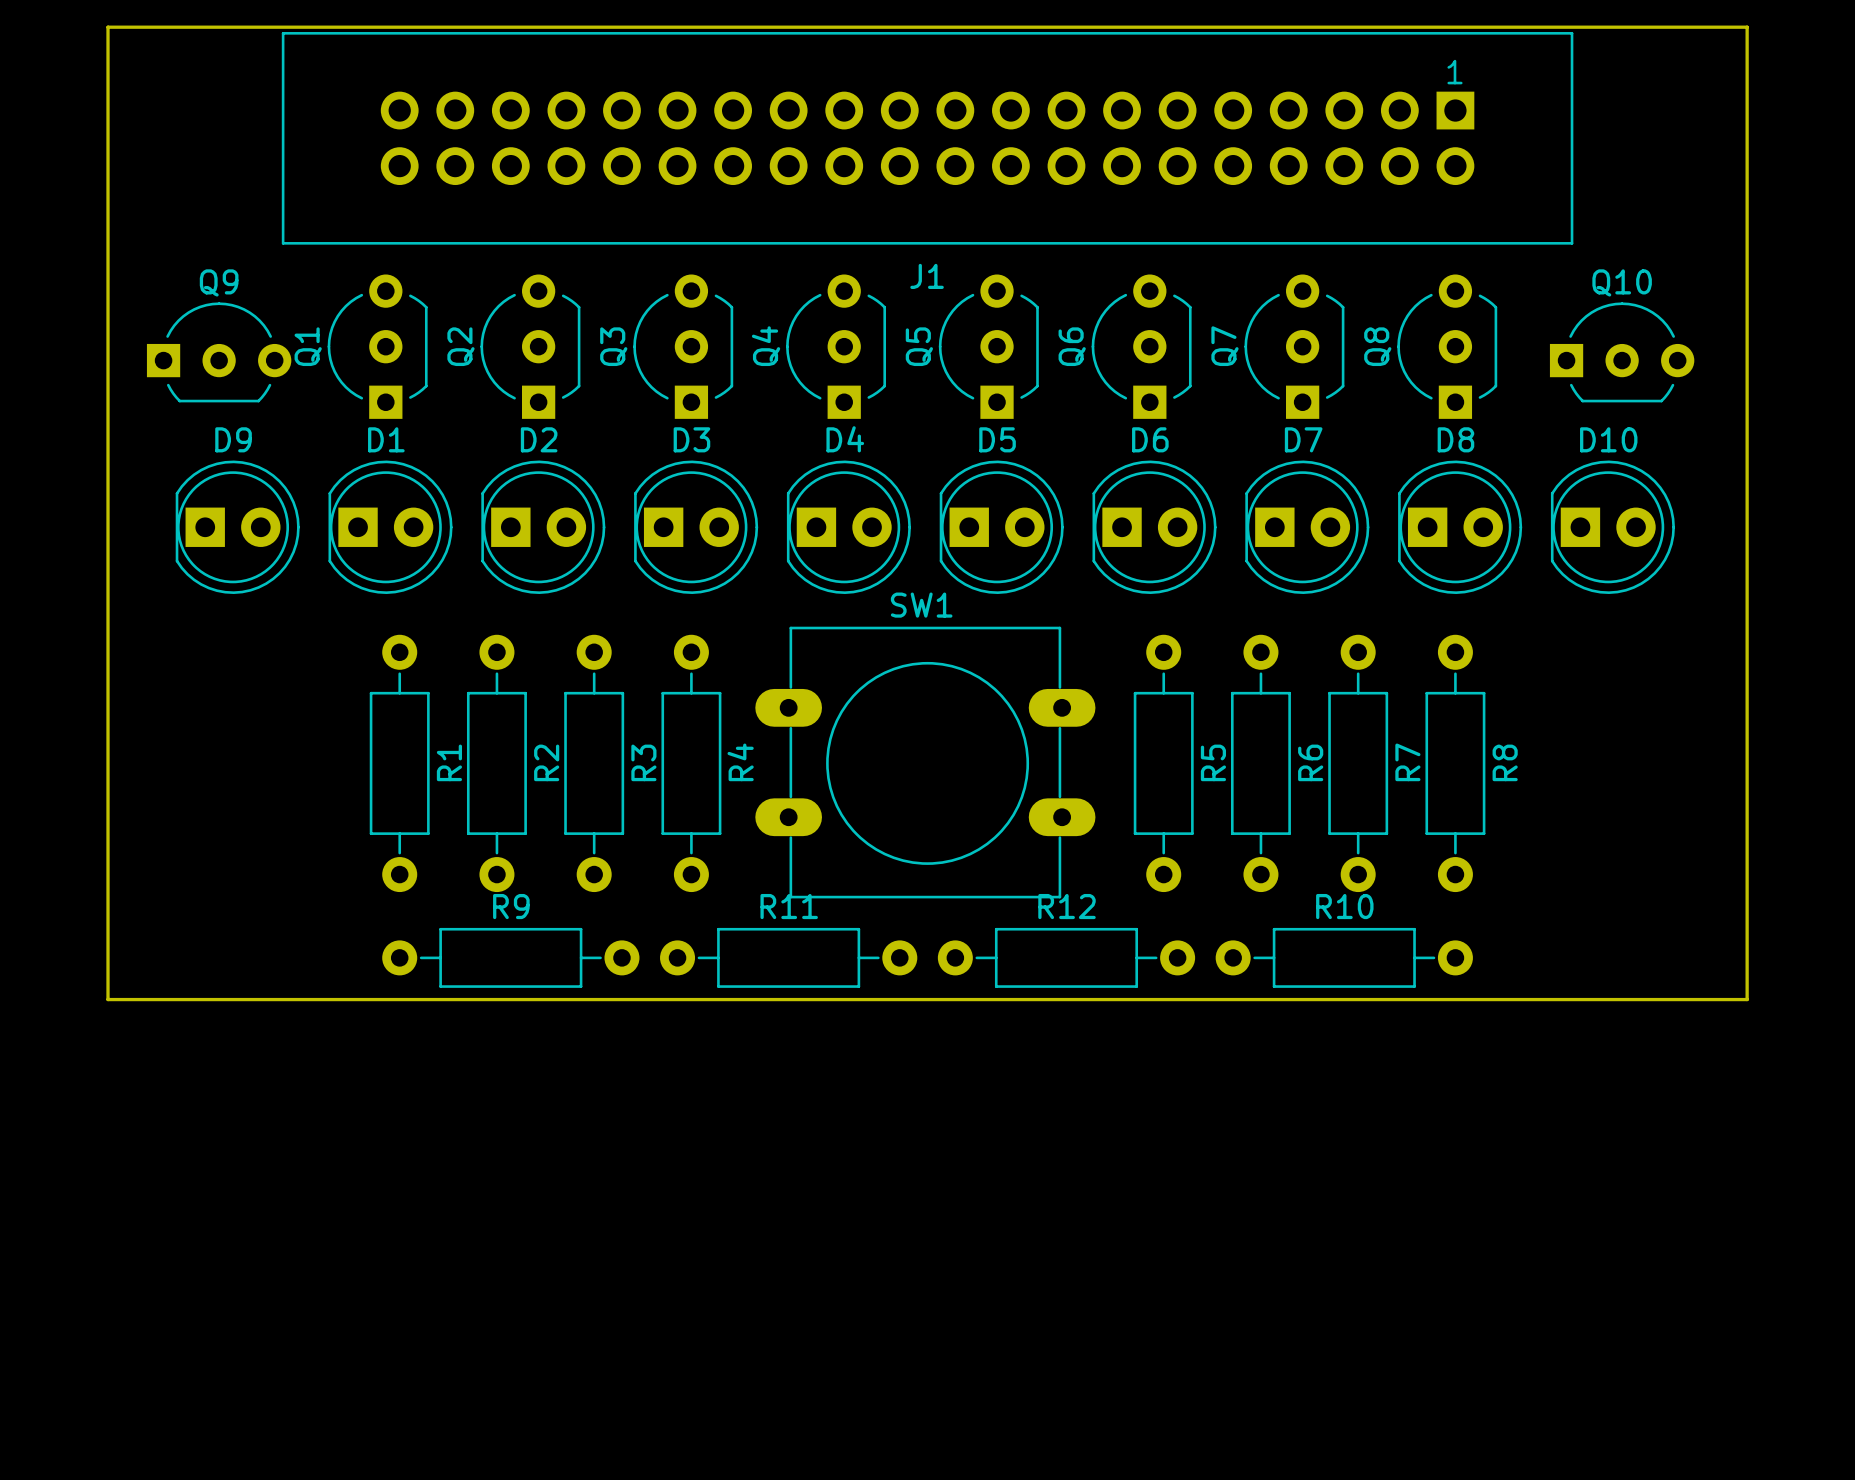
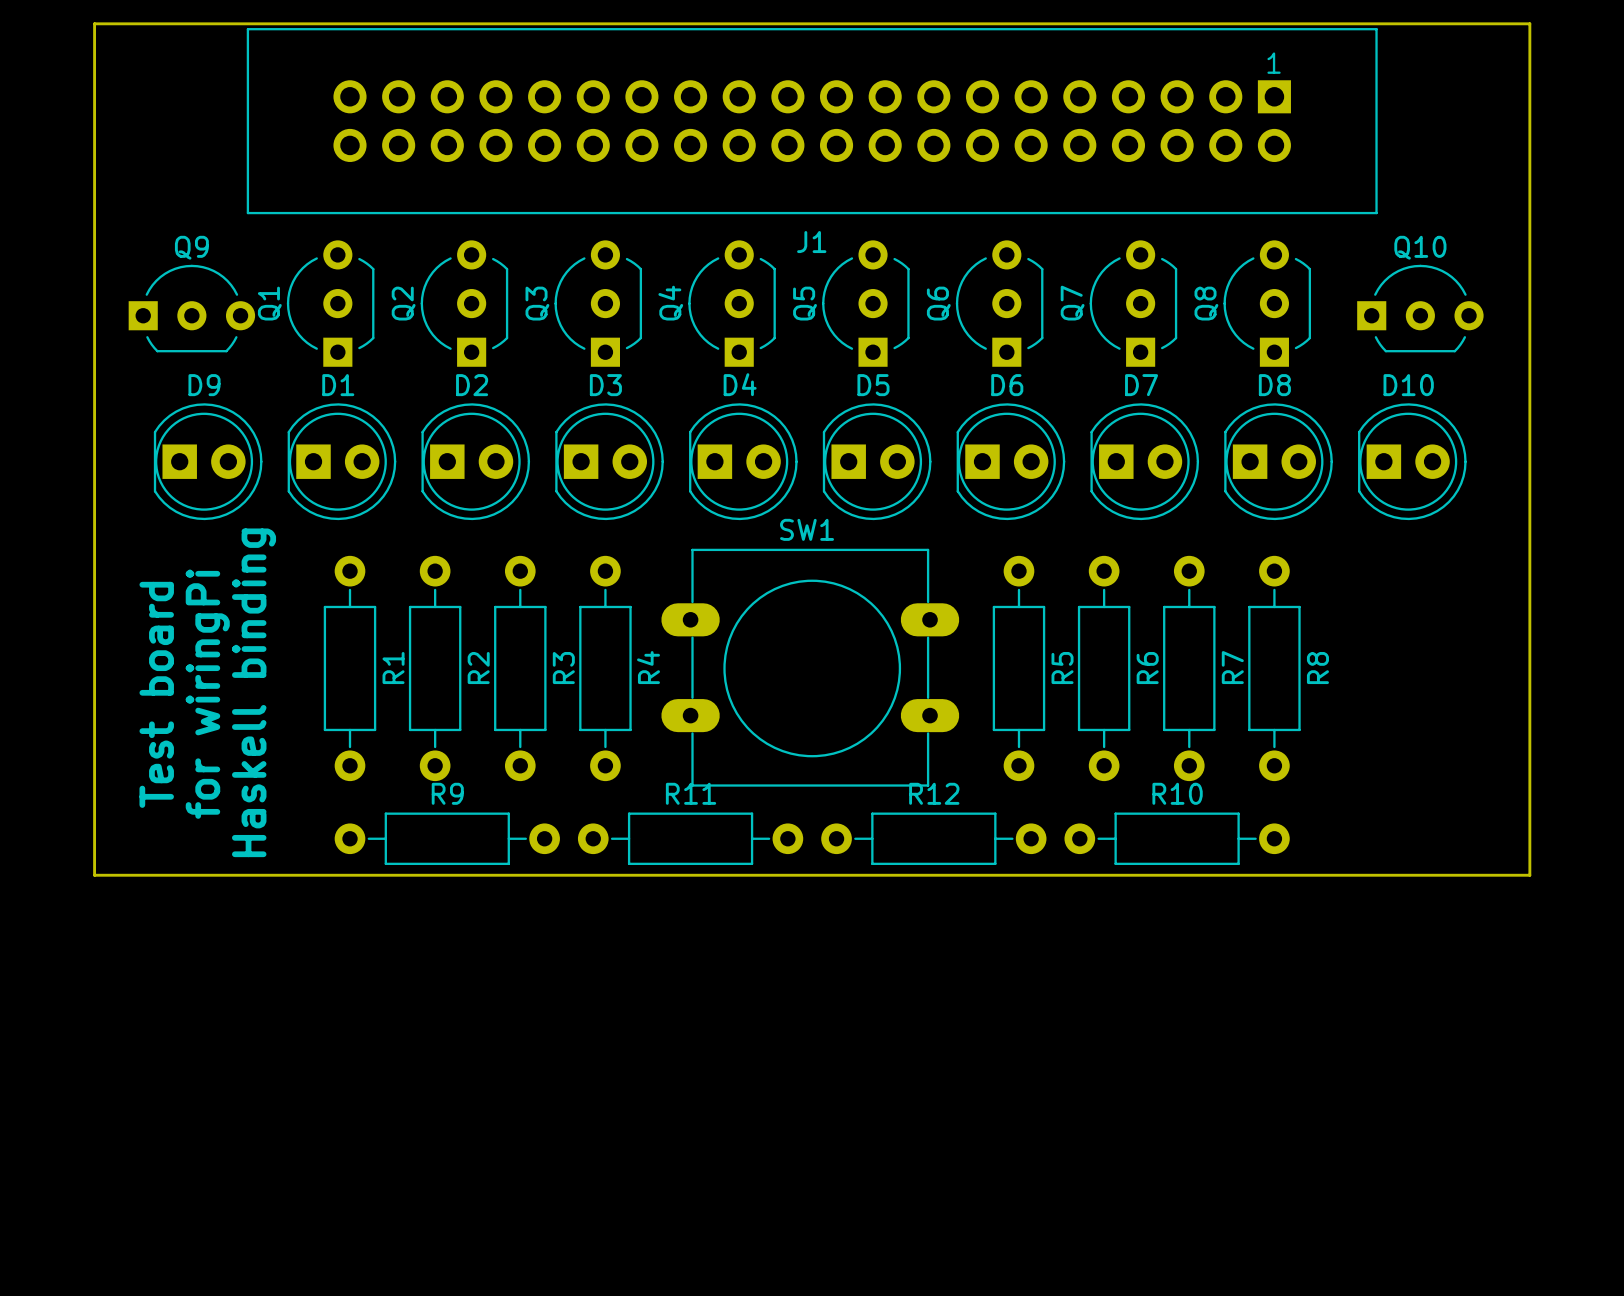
text: none -> Haskell binding (254, 692)
text: none -> for wiringPi (207, 694)
text: none -> Test board (156, 694)

